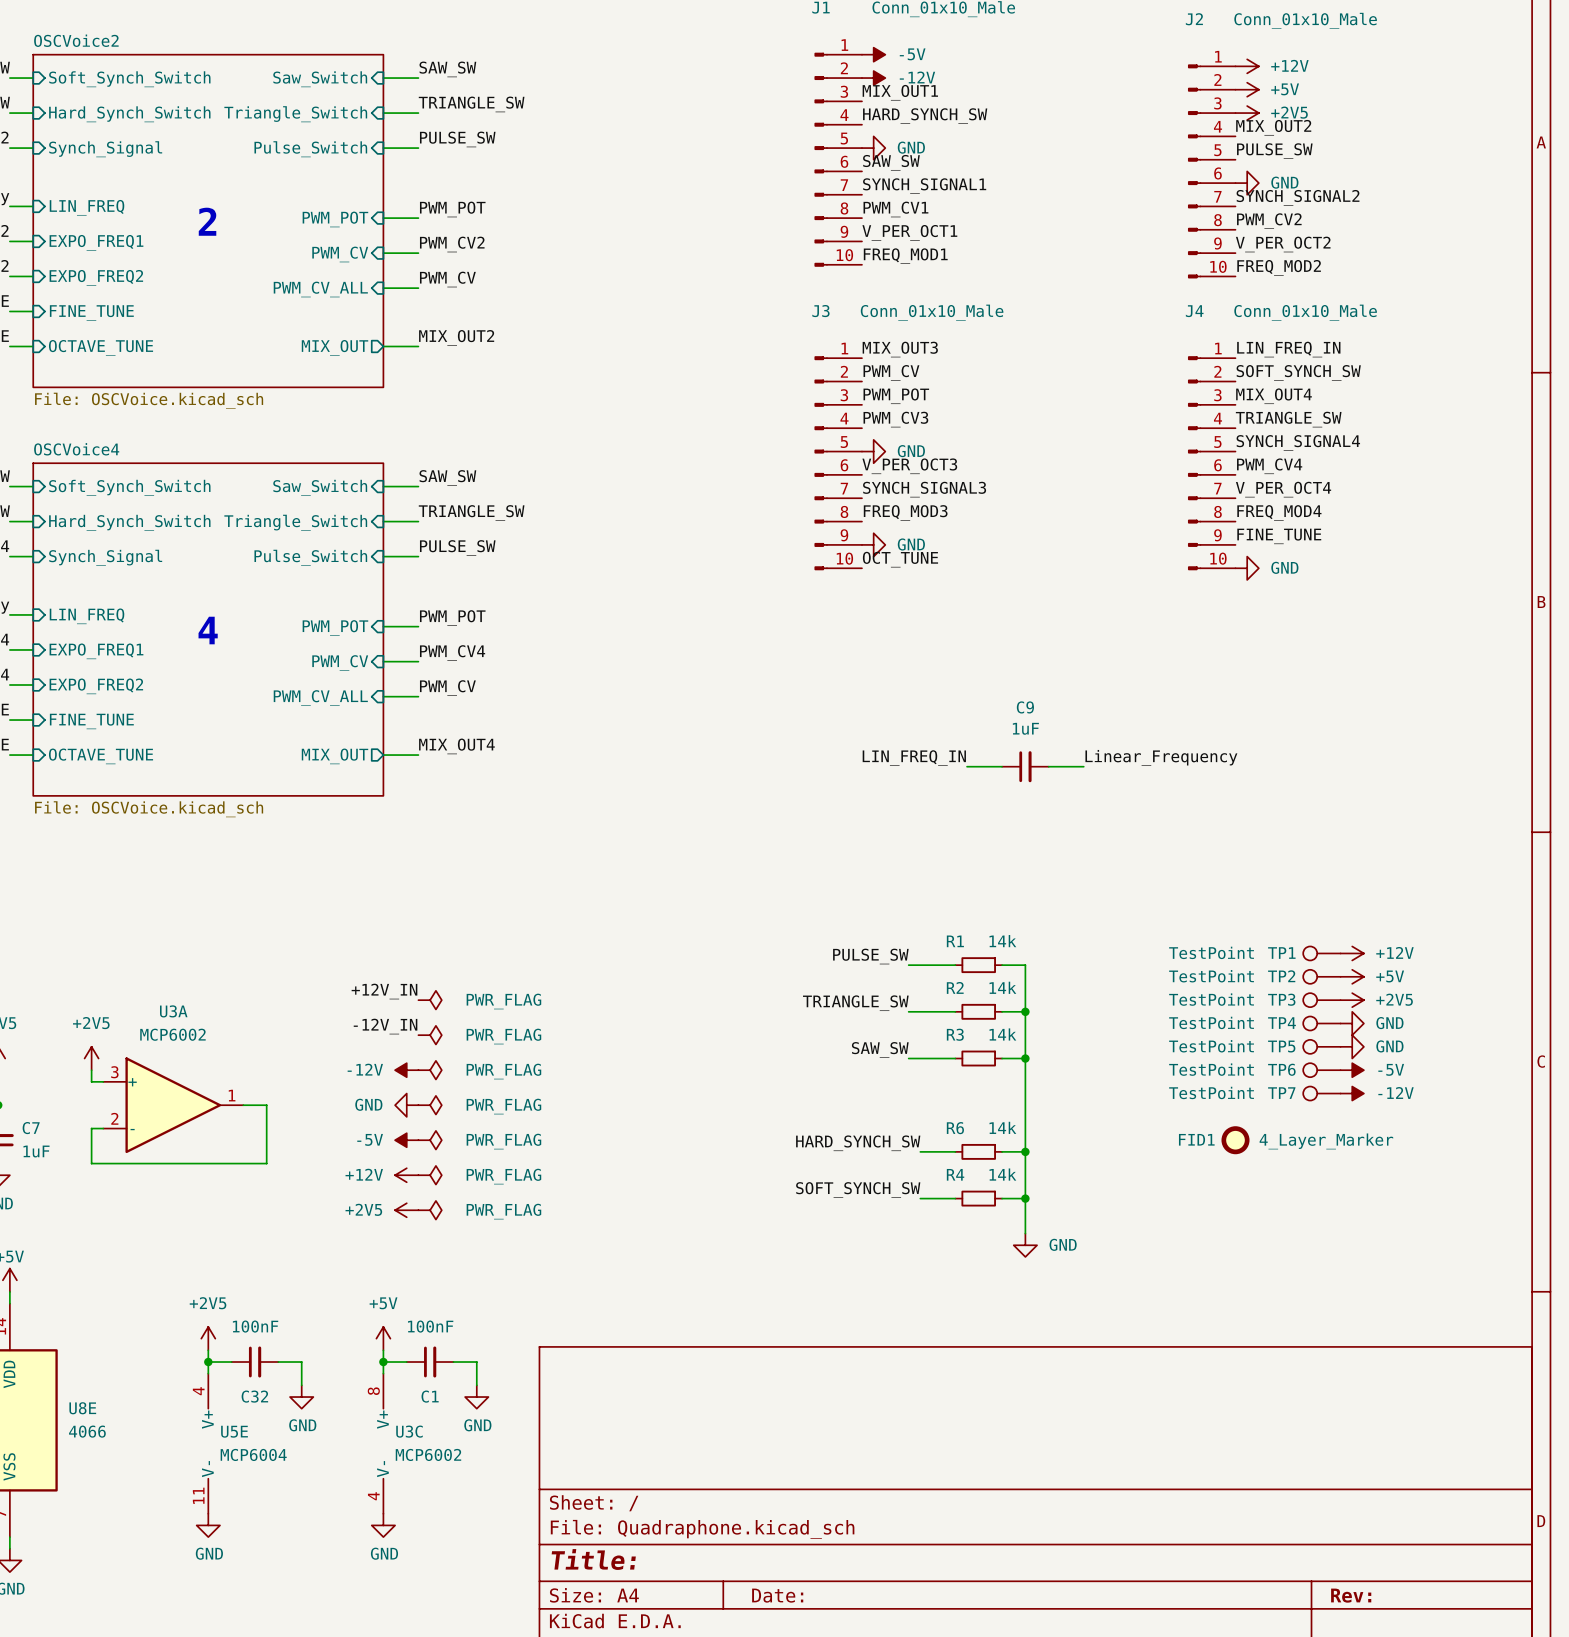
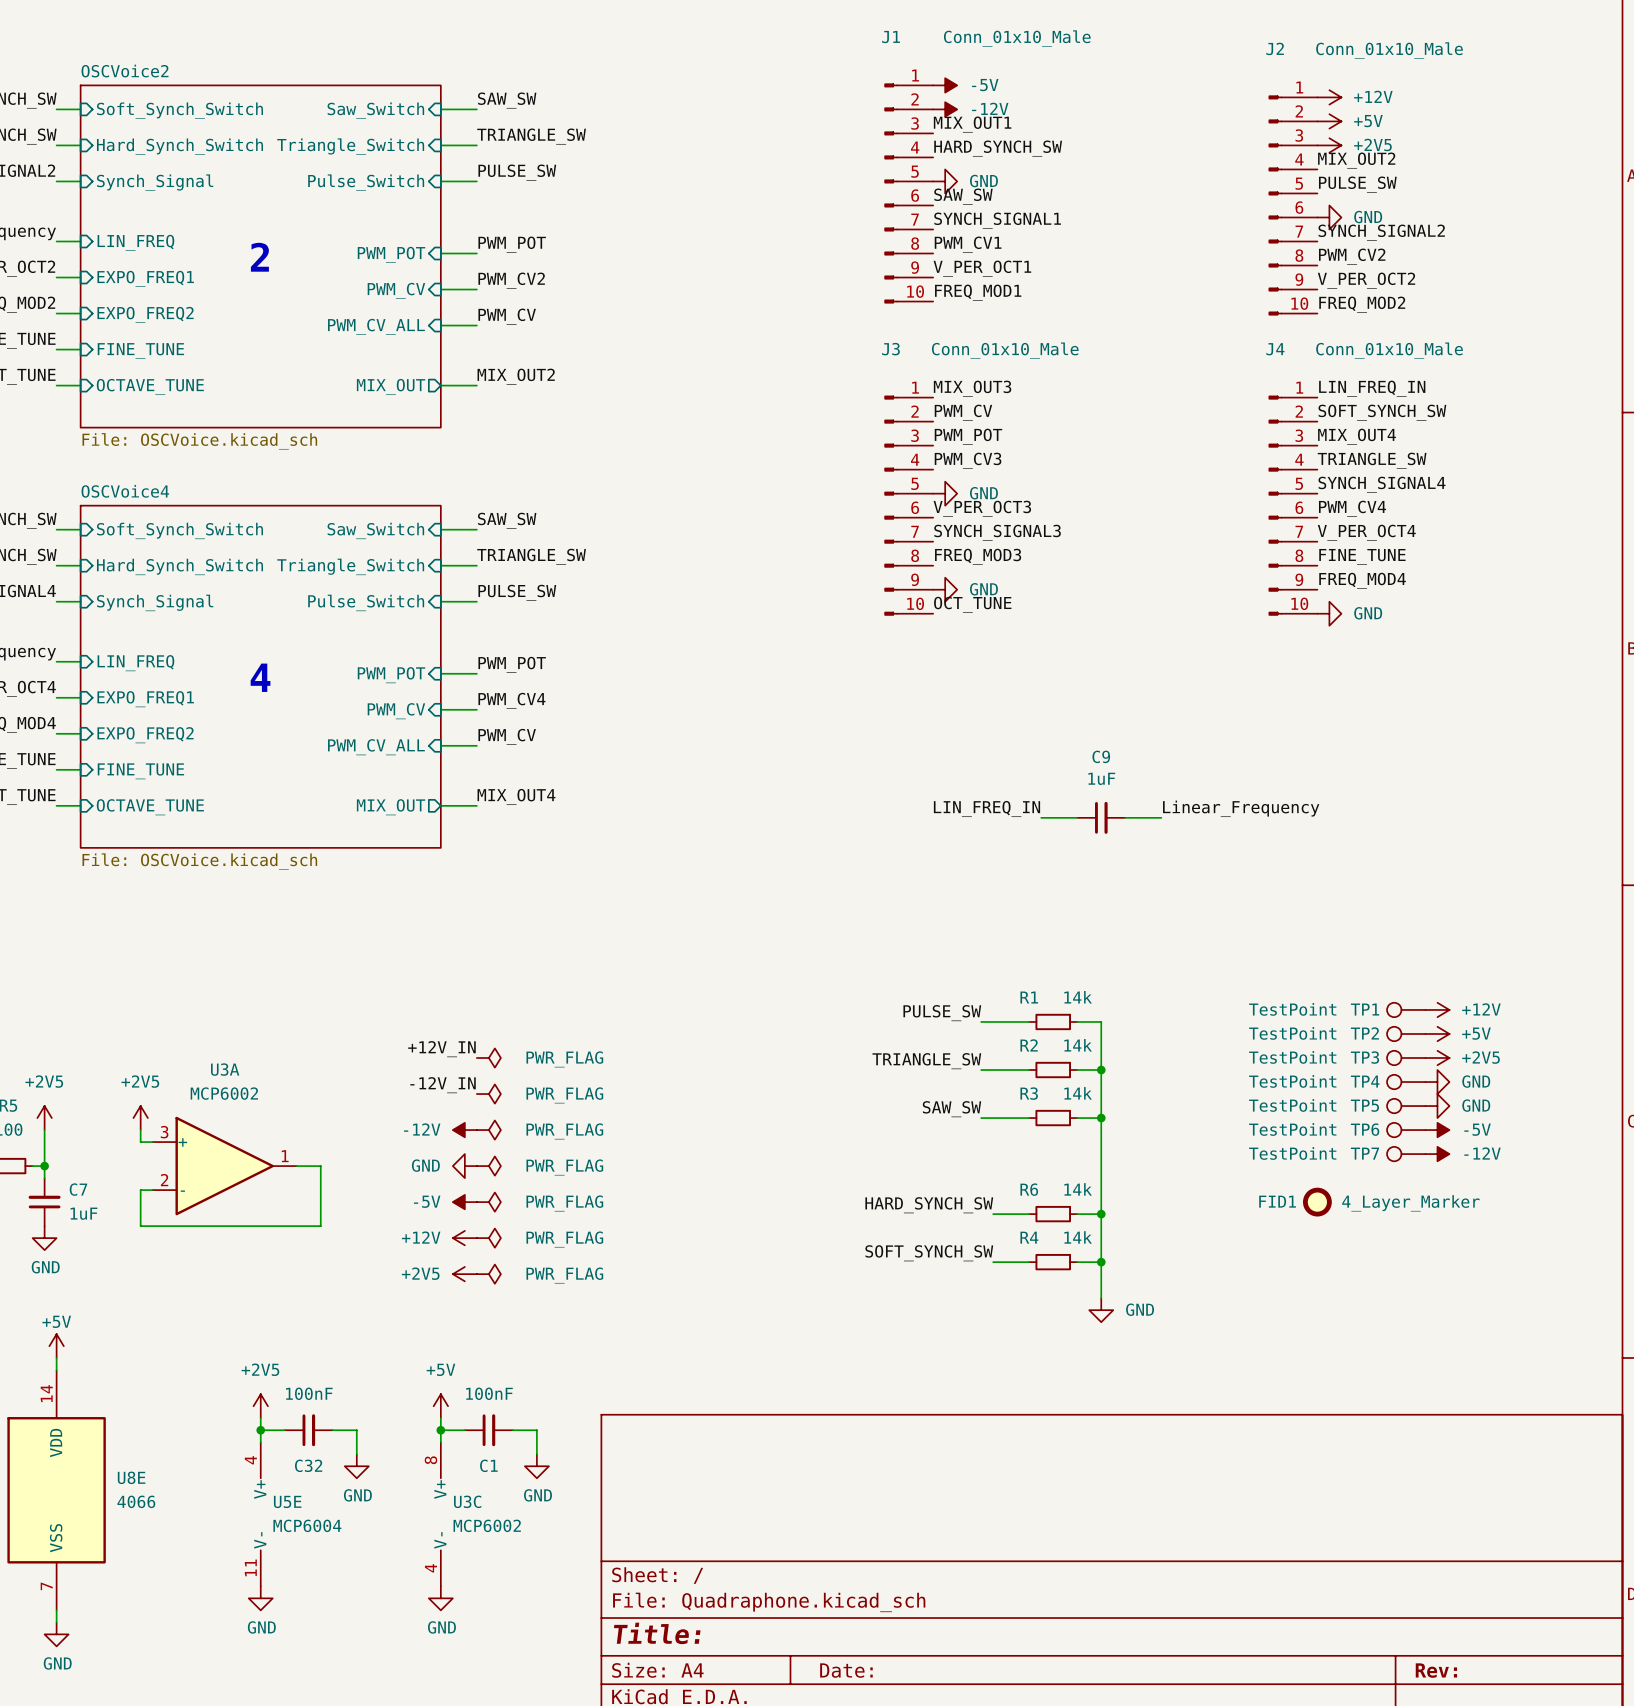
label: FREQ_MOD4 (1279, 512) -> FINE_TUNE (1362, 556)
label: FINE_TUNE (1279, 536) -> FREQ_MOD4 (1362, 580)

